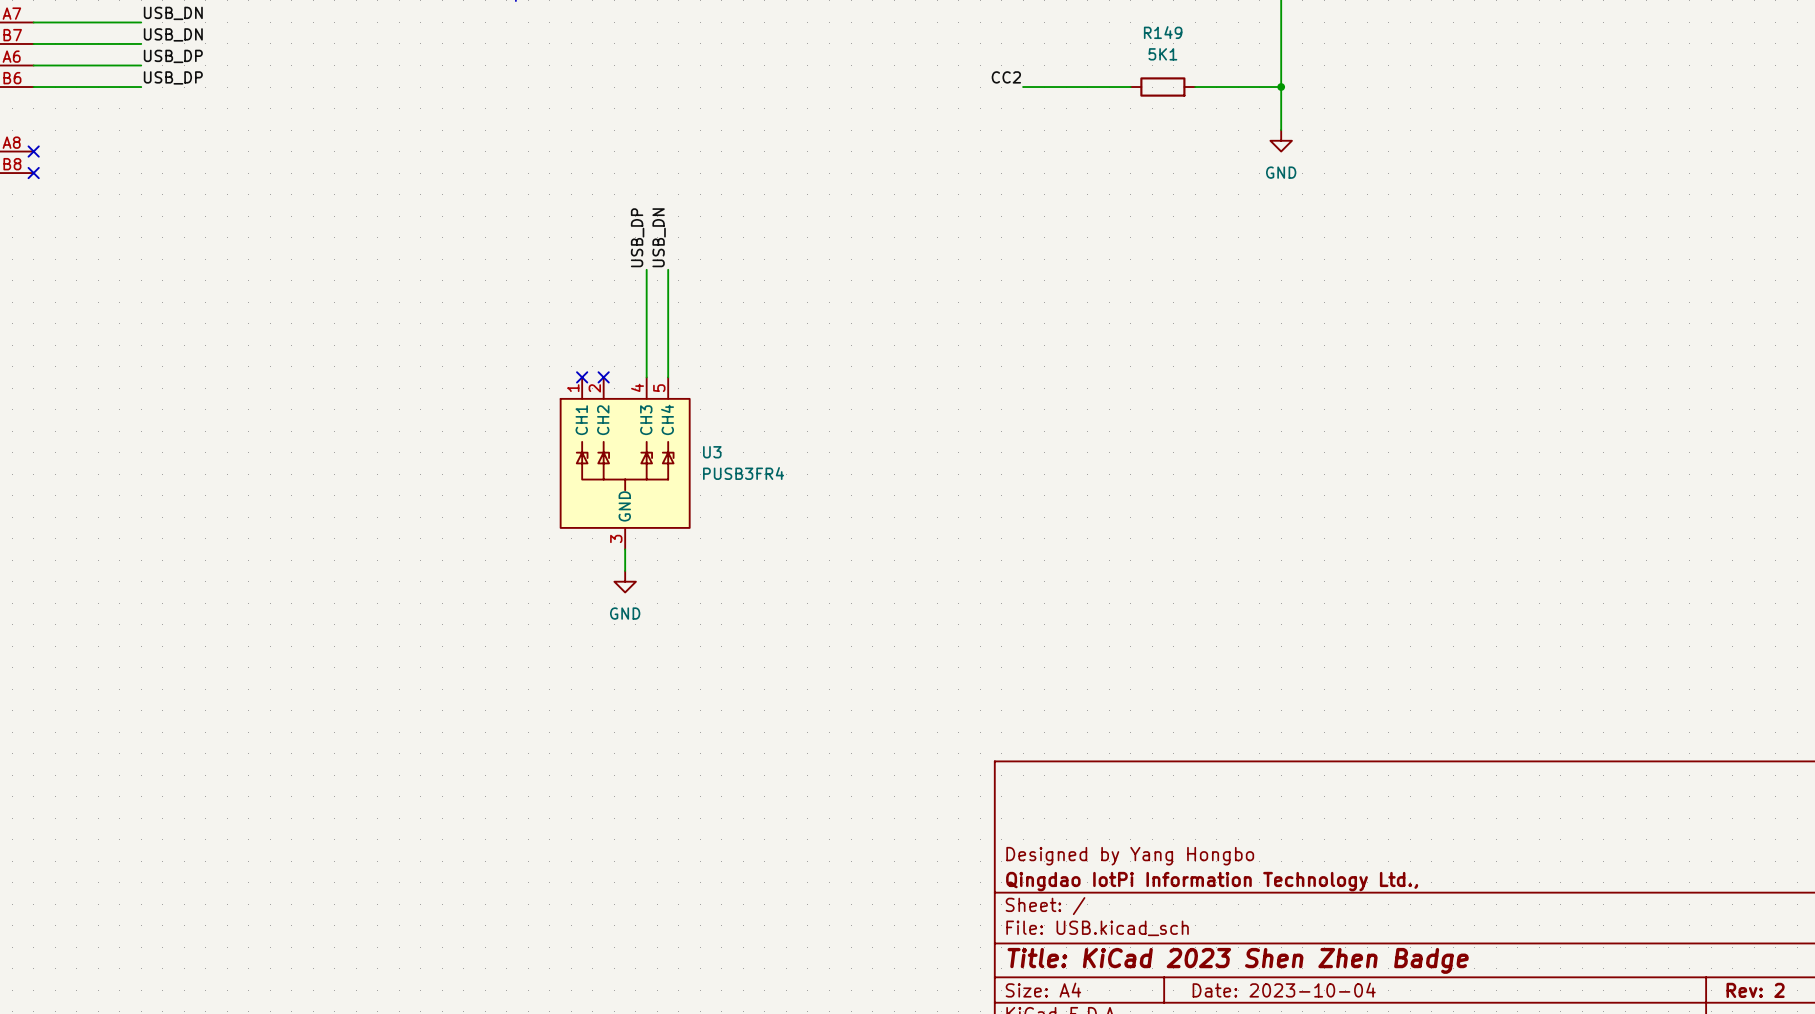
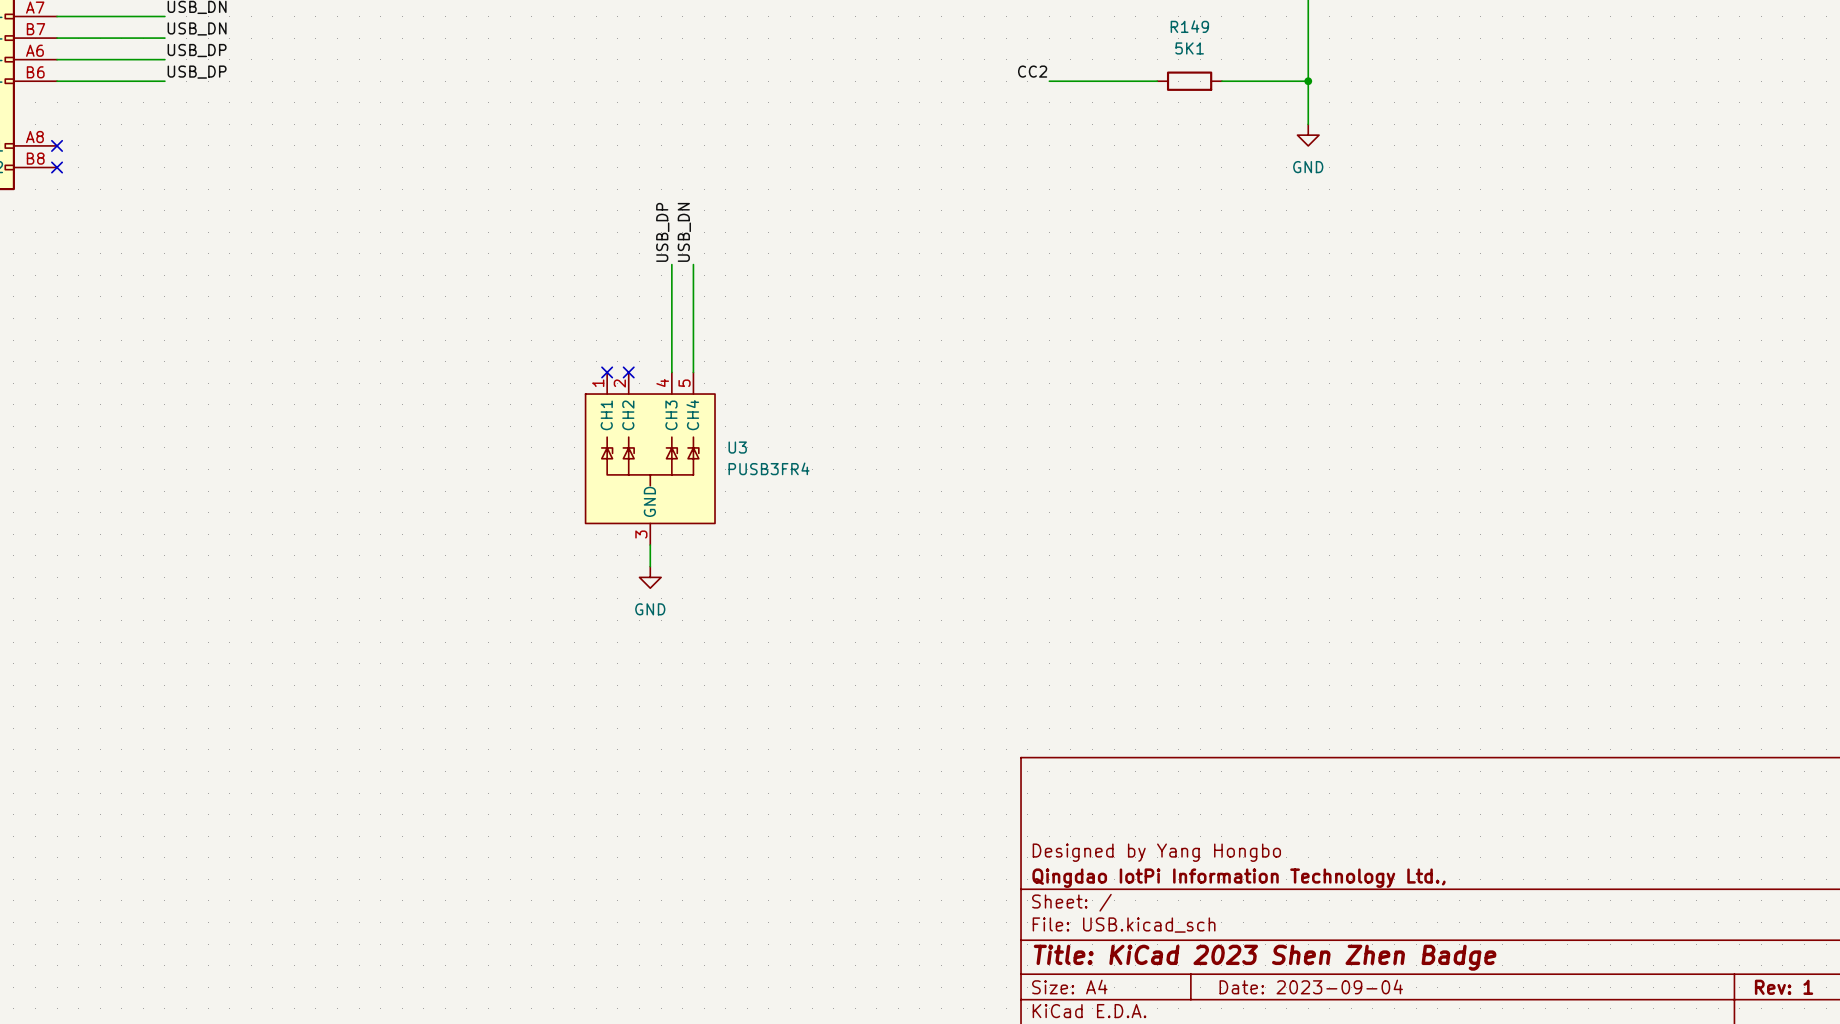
title block: Date: 2023-10-04 (1284, 990) -> Date: 2023-09-04 (1311, 987)
title block: Rev: 2 (1755, 990) -> Rev: 1 (1784, 987)

